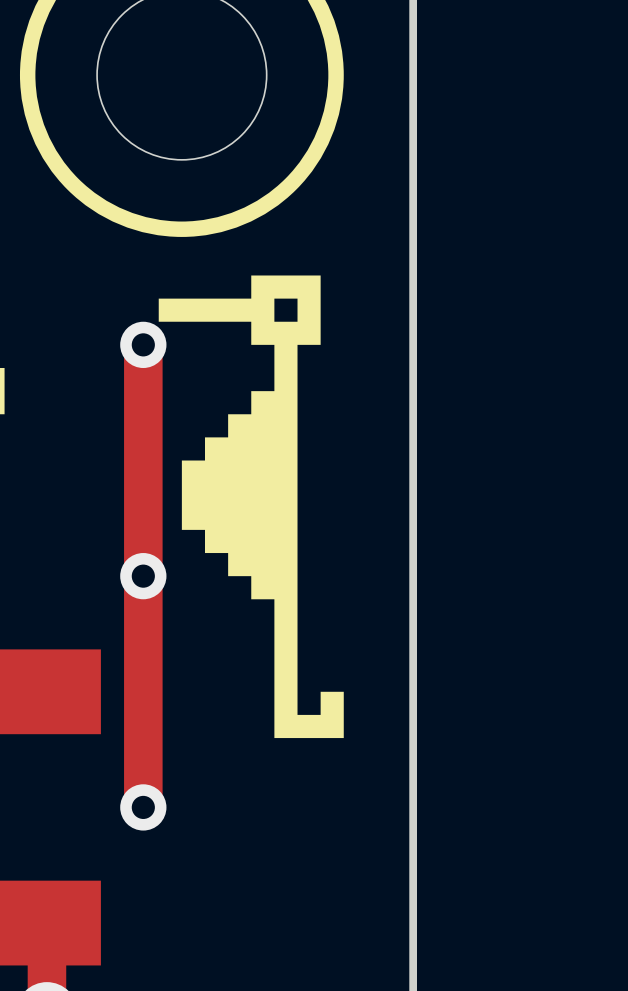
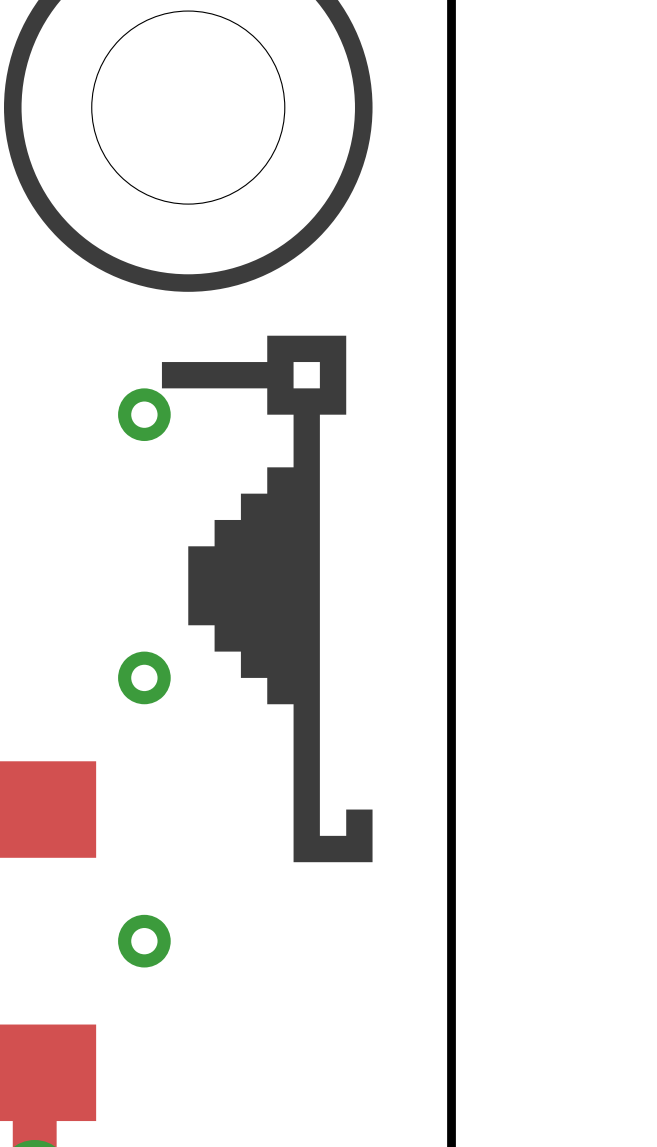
track: (143, 344) (143, 807) -> none

